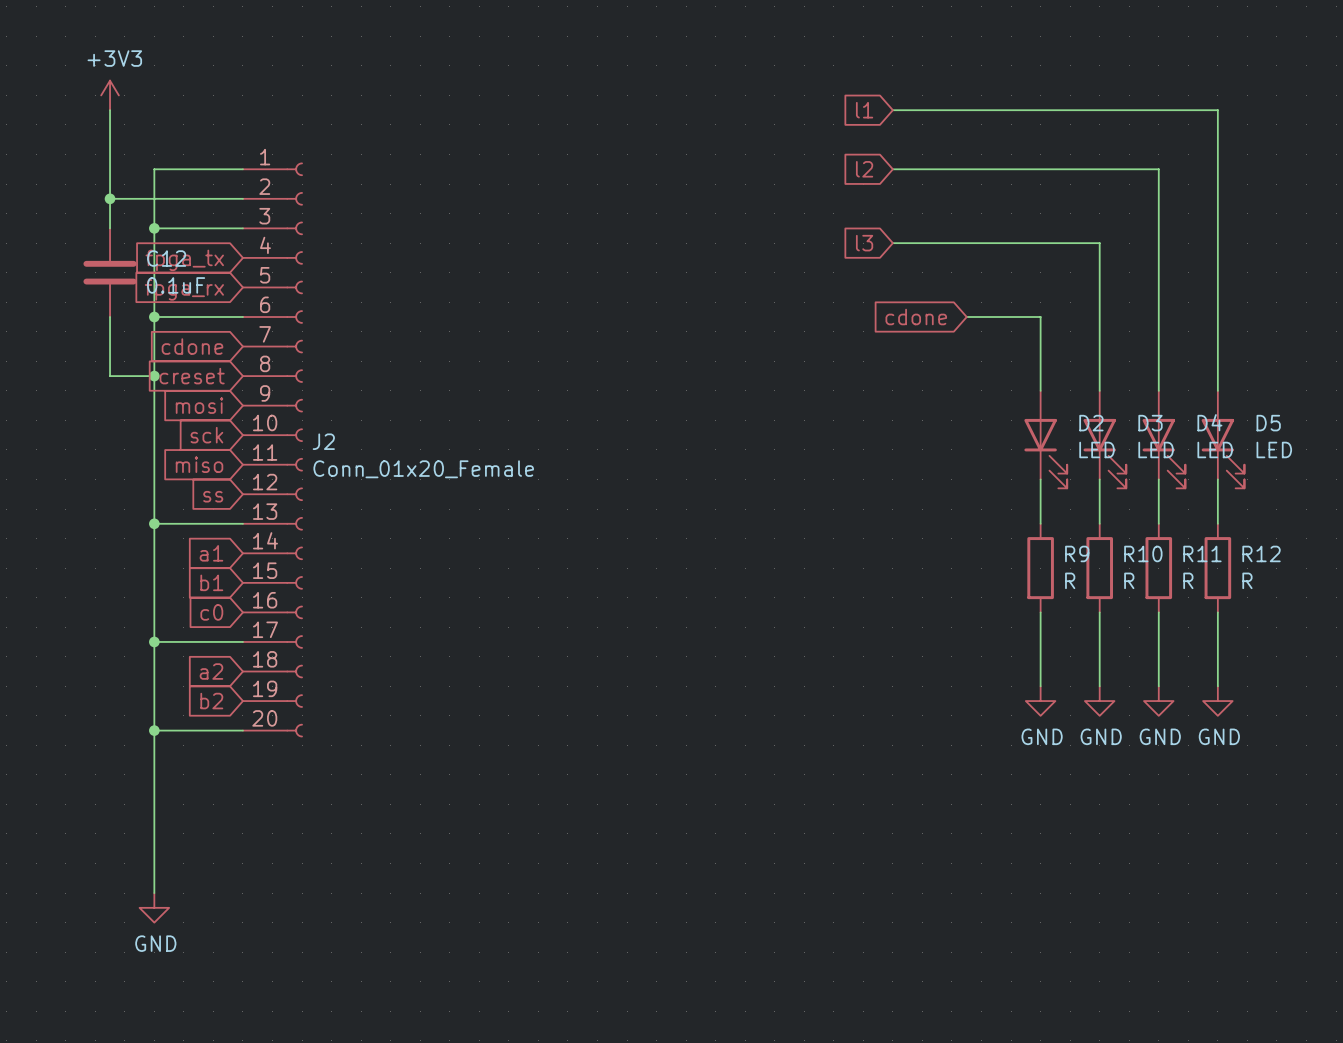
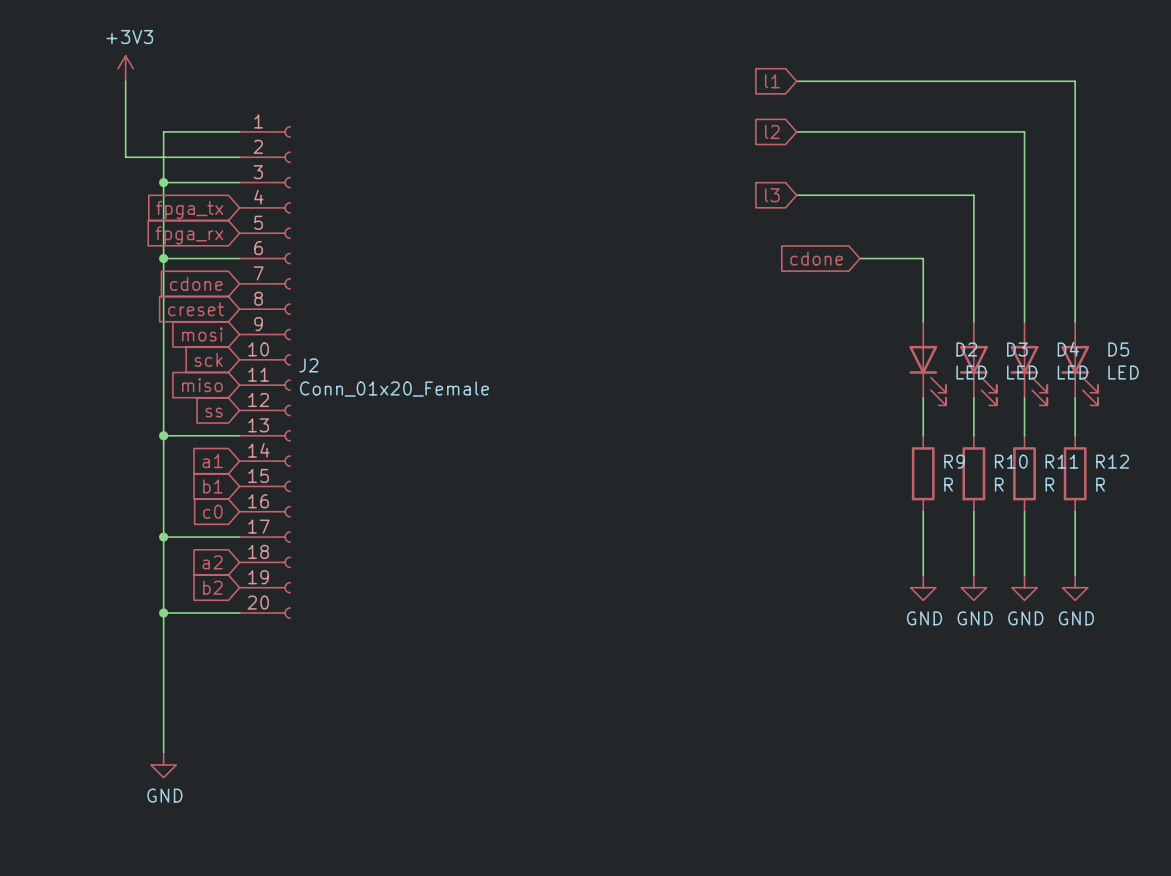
wire: (110, 198) (110, 228) -> none
junction: (110, 198) -> none
C12: 0.1uF (110, 272) -> none
wire: (110, 317) (110, 376) (154, 376) -> none
junction: (154, 376) -> none

